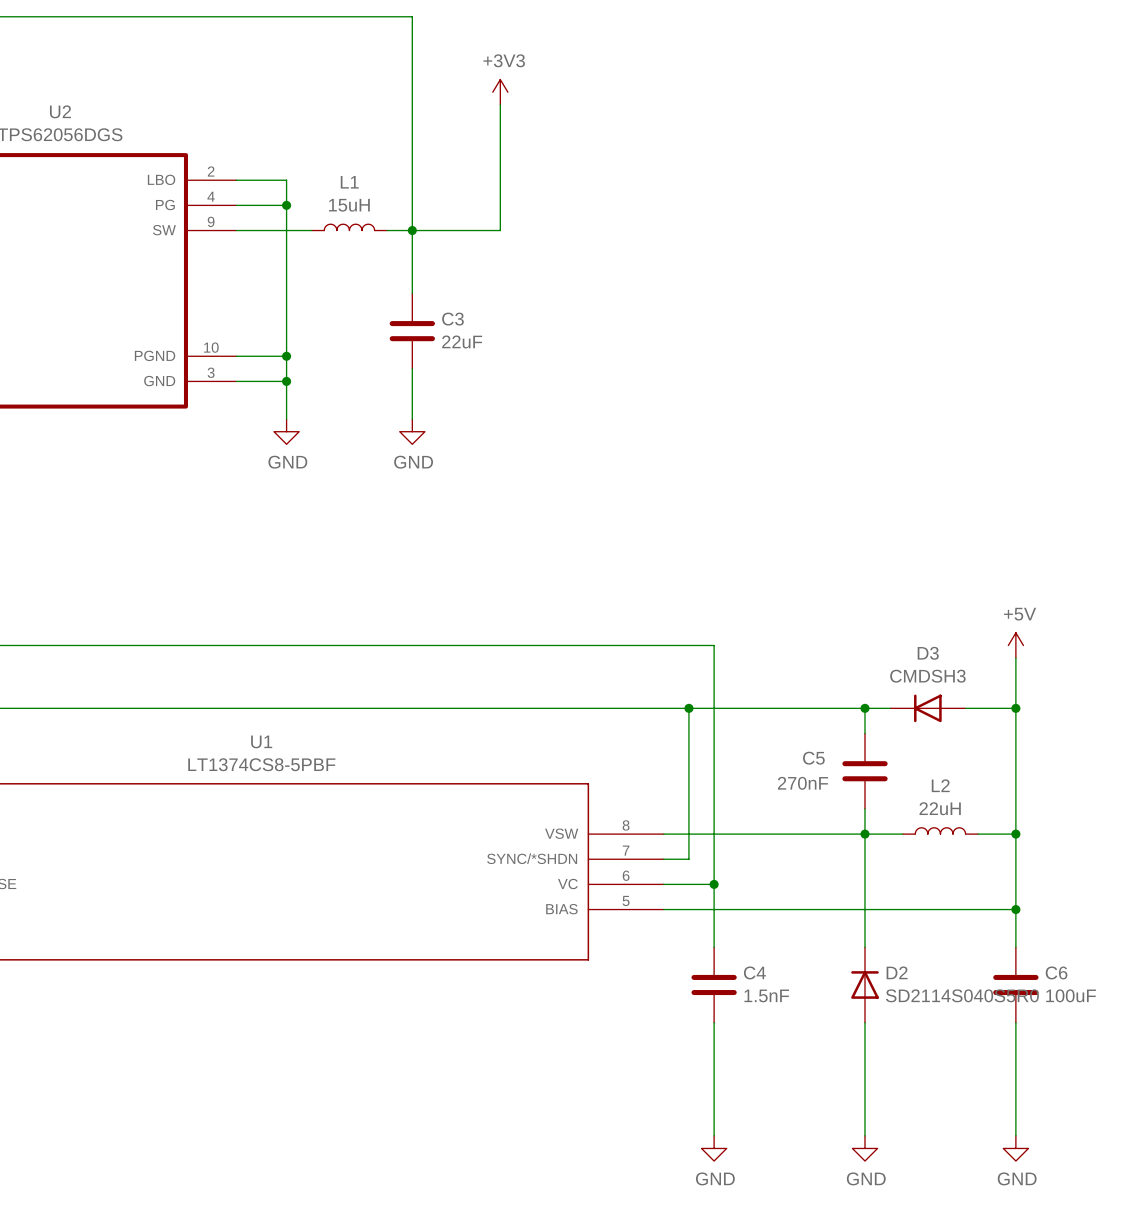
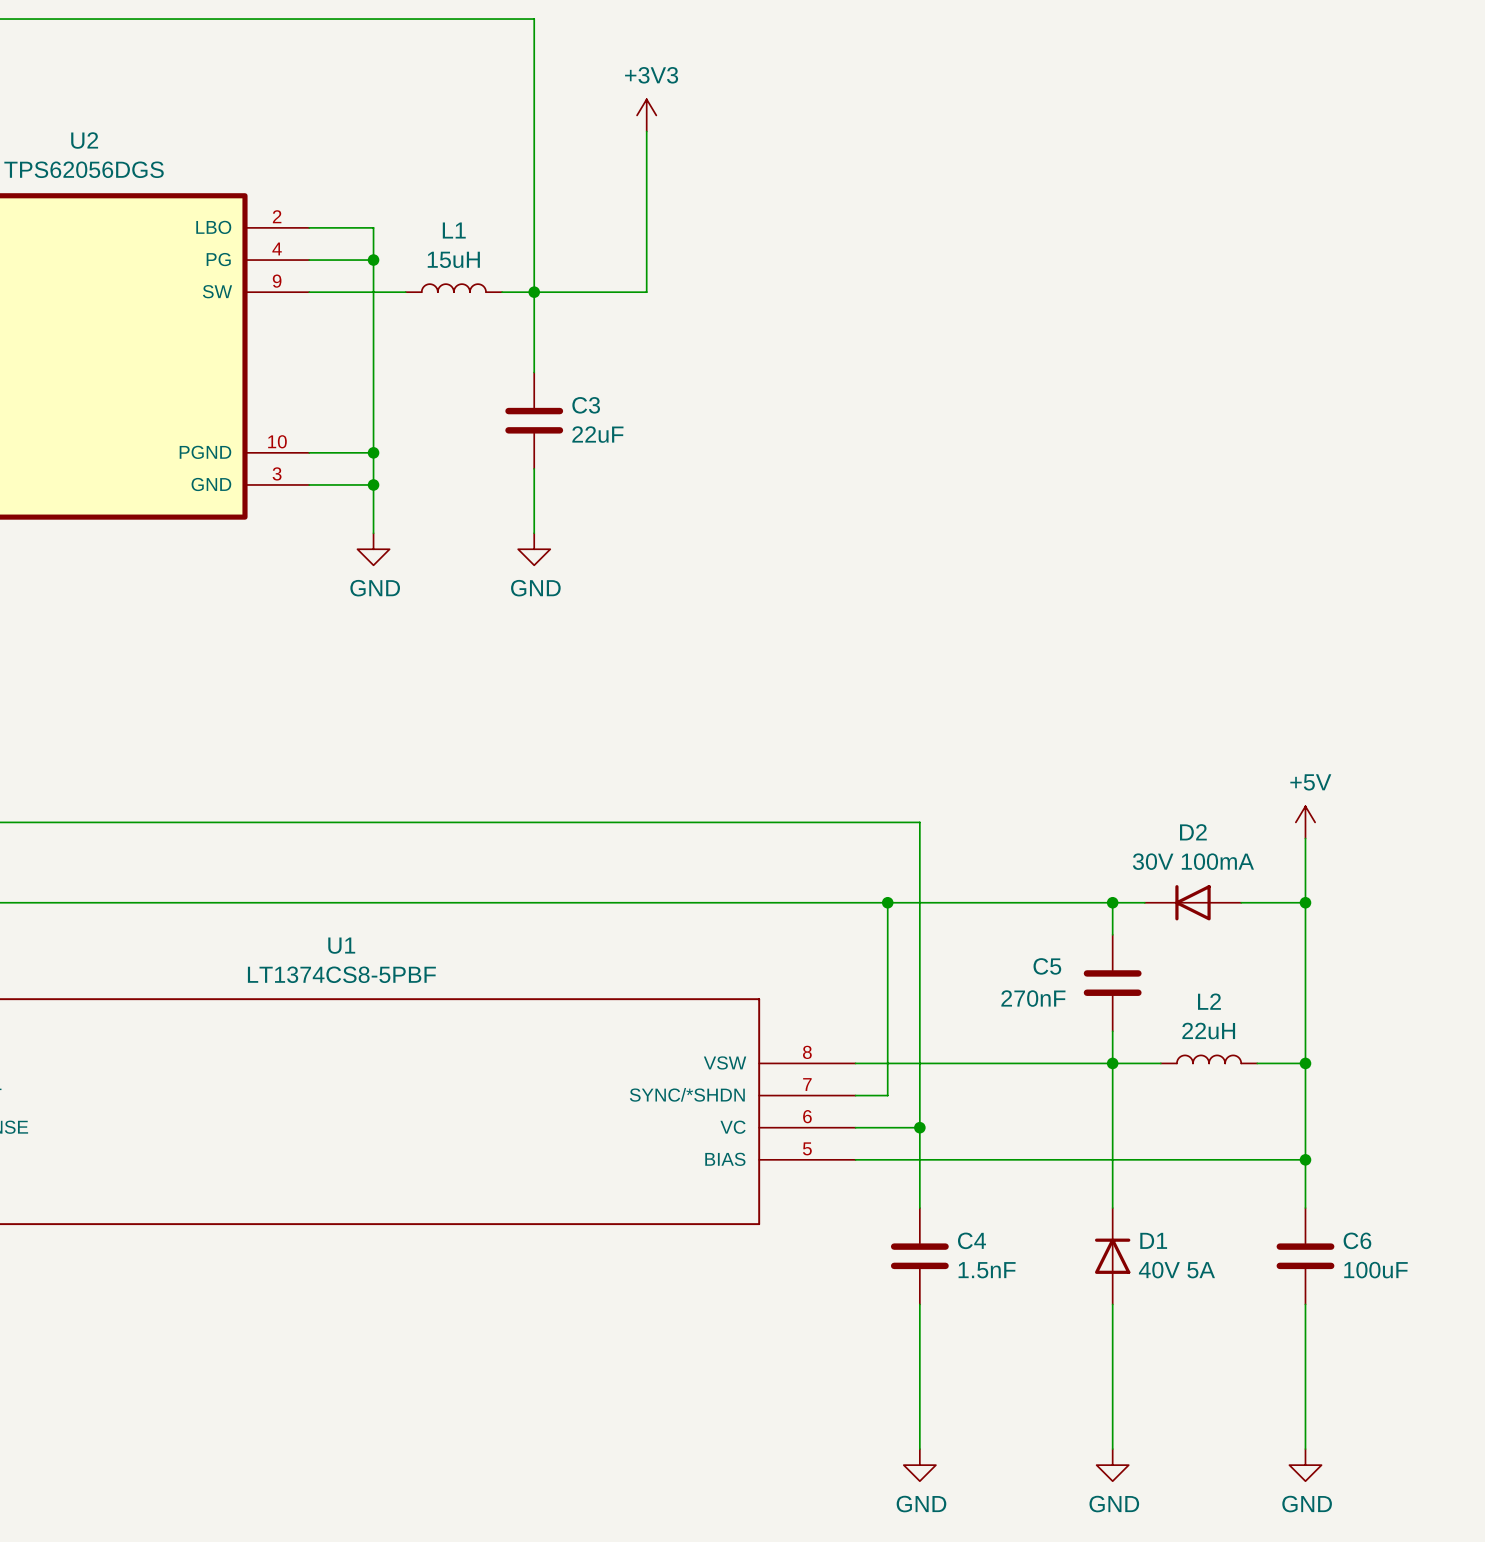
D3 name: D3 (928, 653) -> D2 (1193, 832)
D3 value: CMDSH3 (927, 676) -> 30V 100mA (1193, 861)
D2 name: D2 (897, 972) -> D1 (1153, 1240)
D2 value: SD2114S040S5R0 (962, 995) -> 40V 5A (1176, 1270)

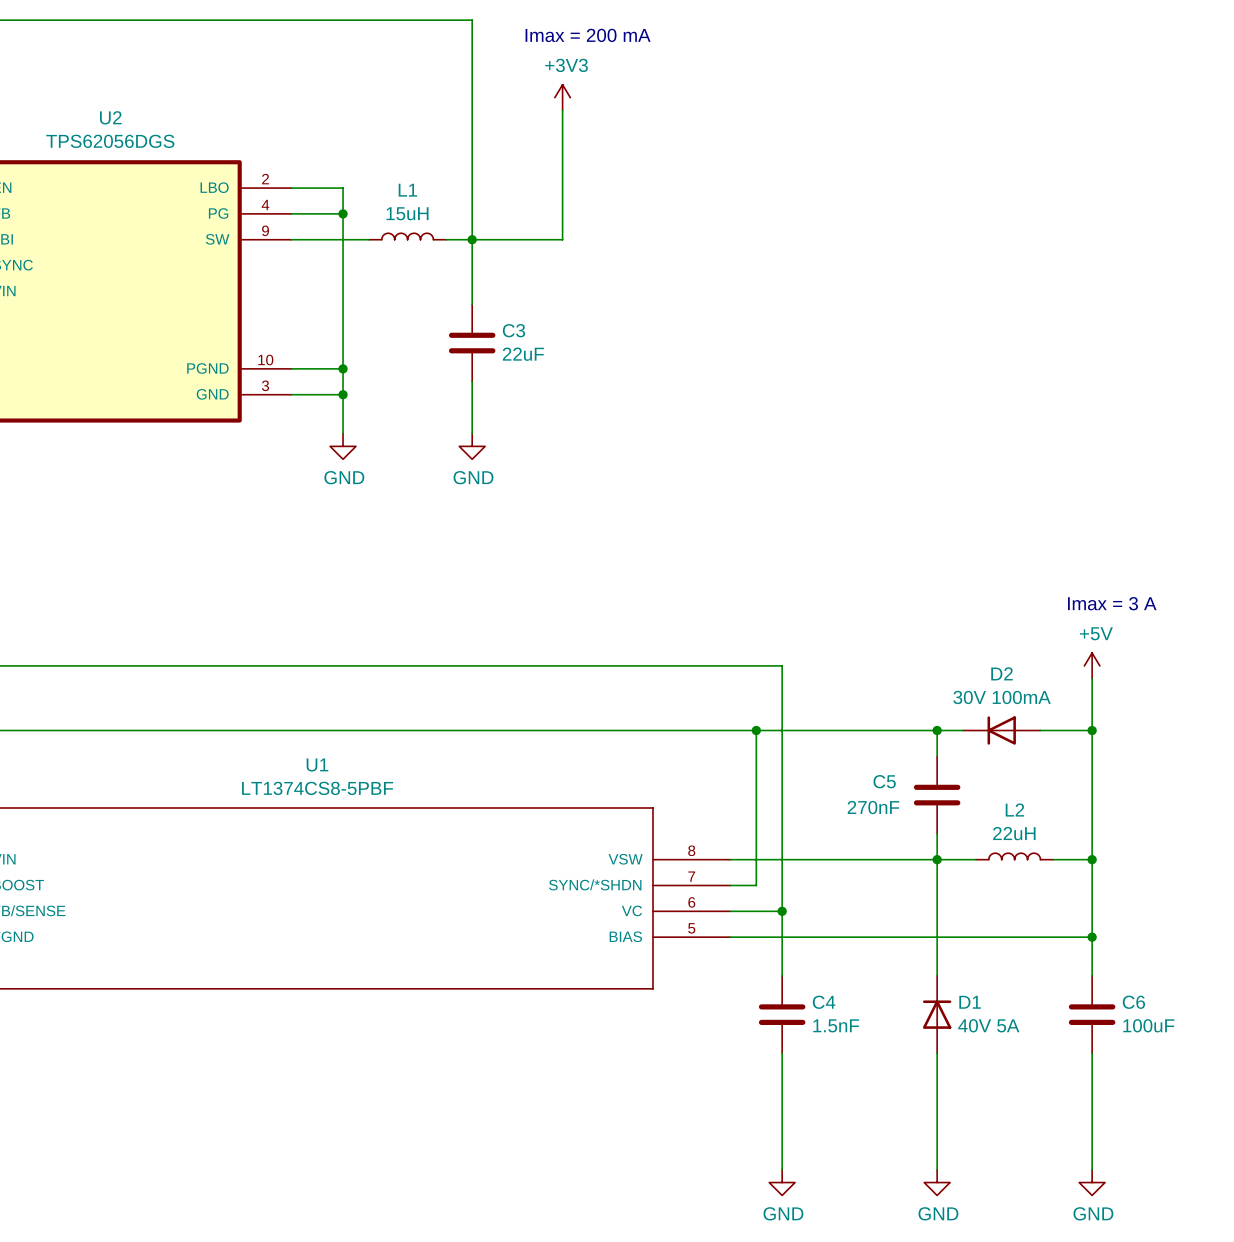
text: none -> Imax = 200 mA (588, 35)
text: none -> Imax = 3 A (1112, 603)

